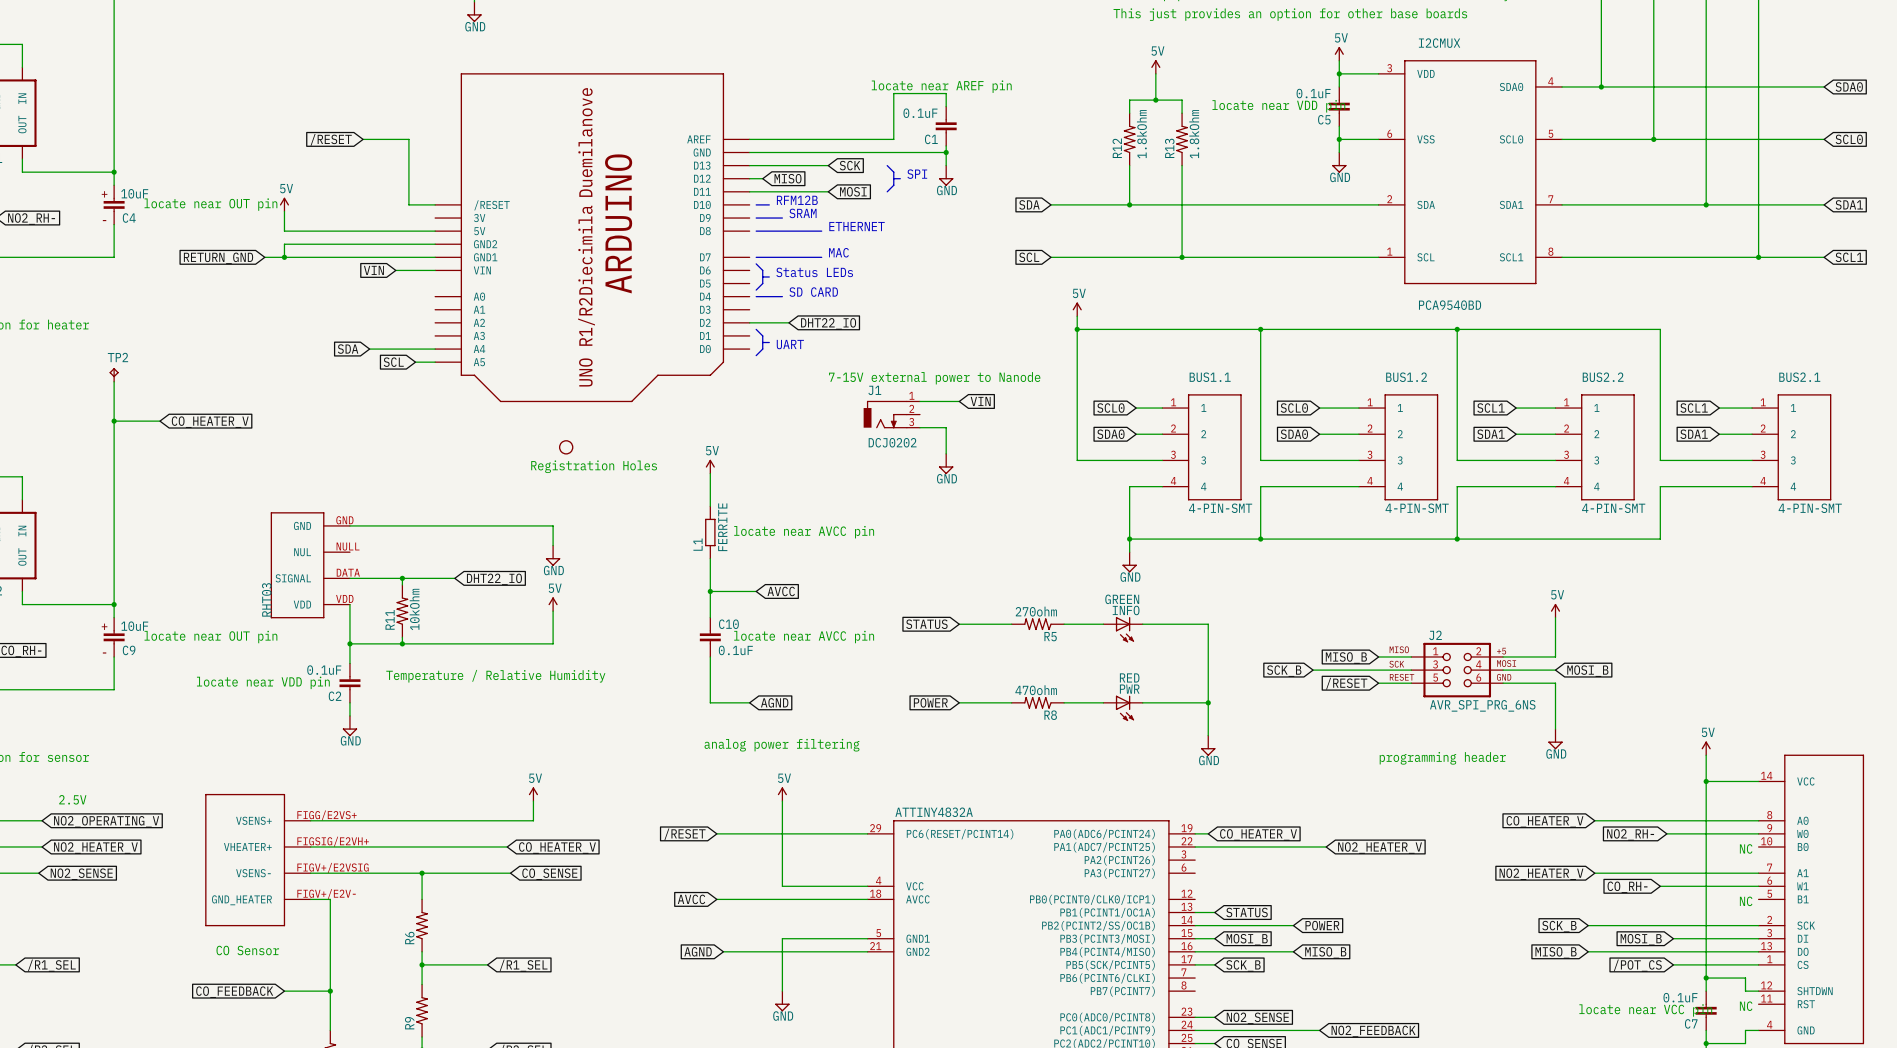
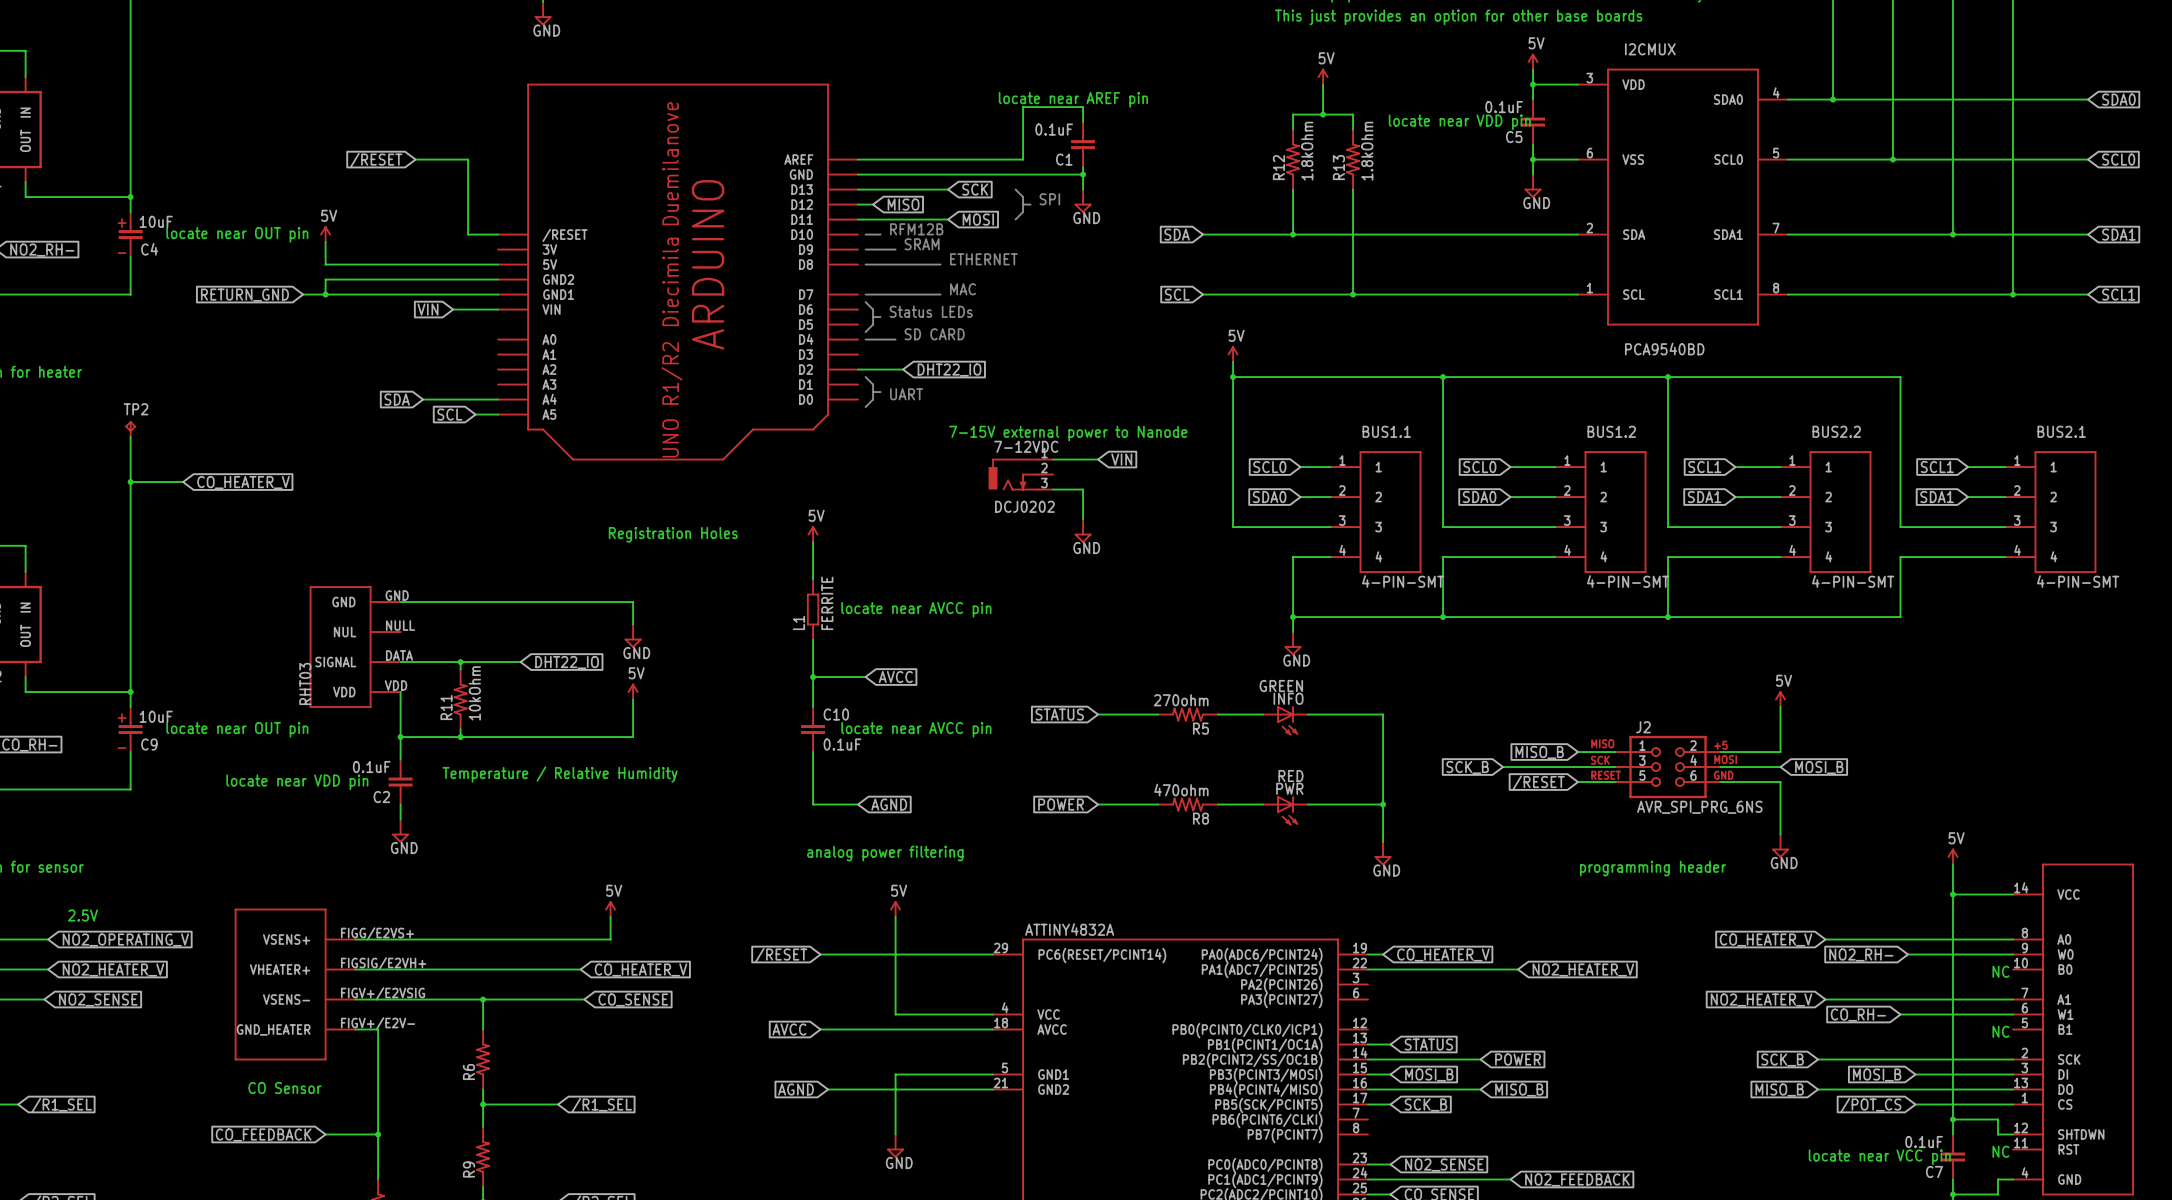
J1 name: J1 (874, 390) -> 7-12VDC (1026, 446)
part: (566, 447) -> none

